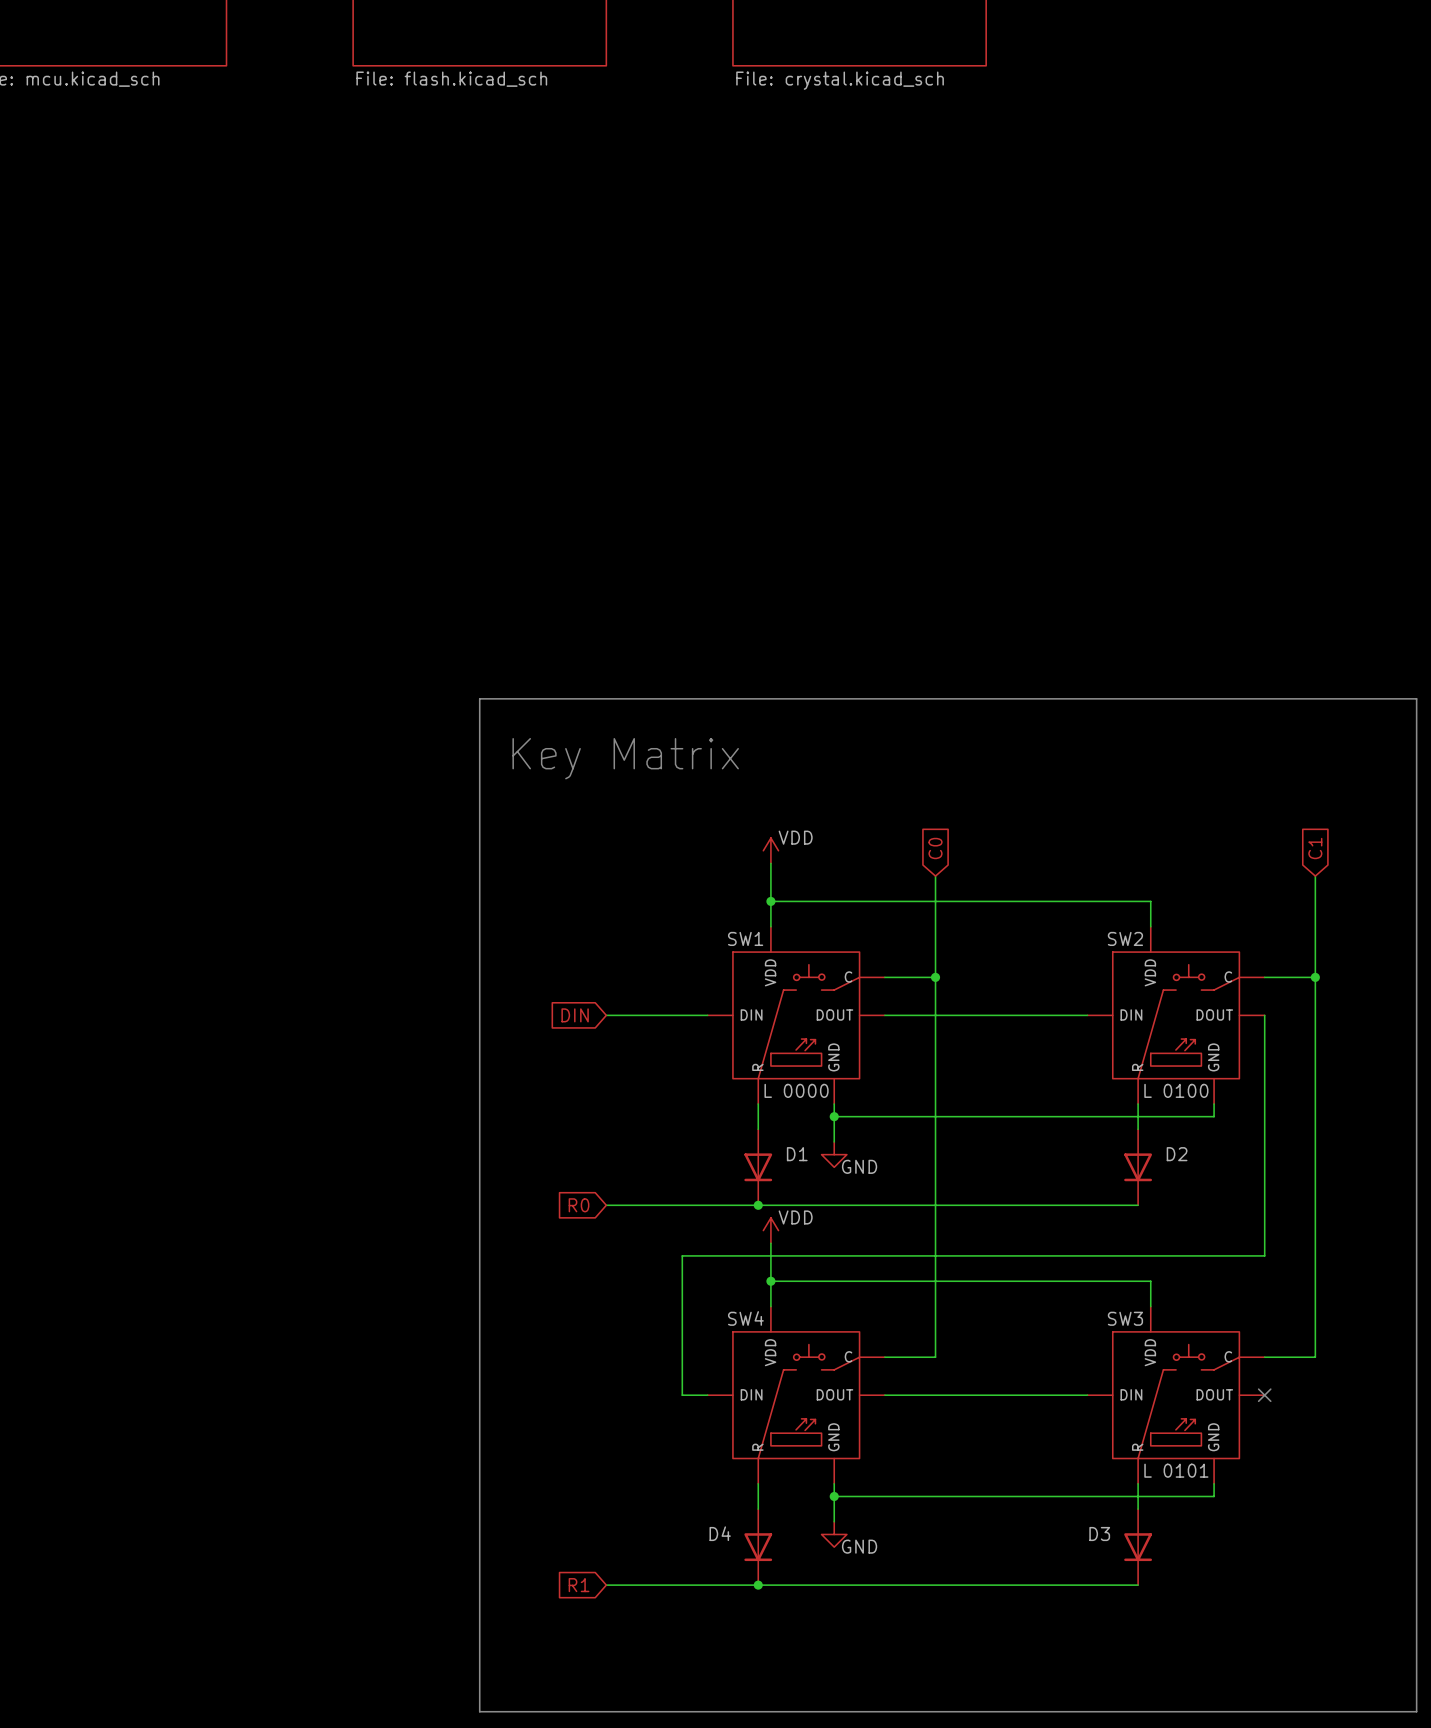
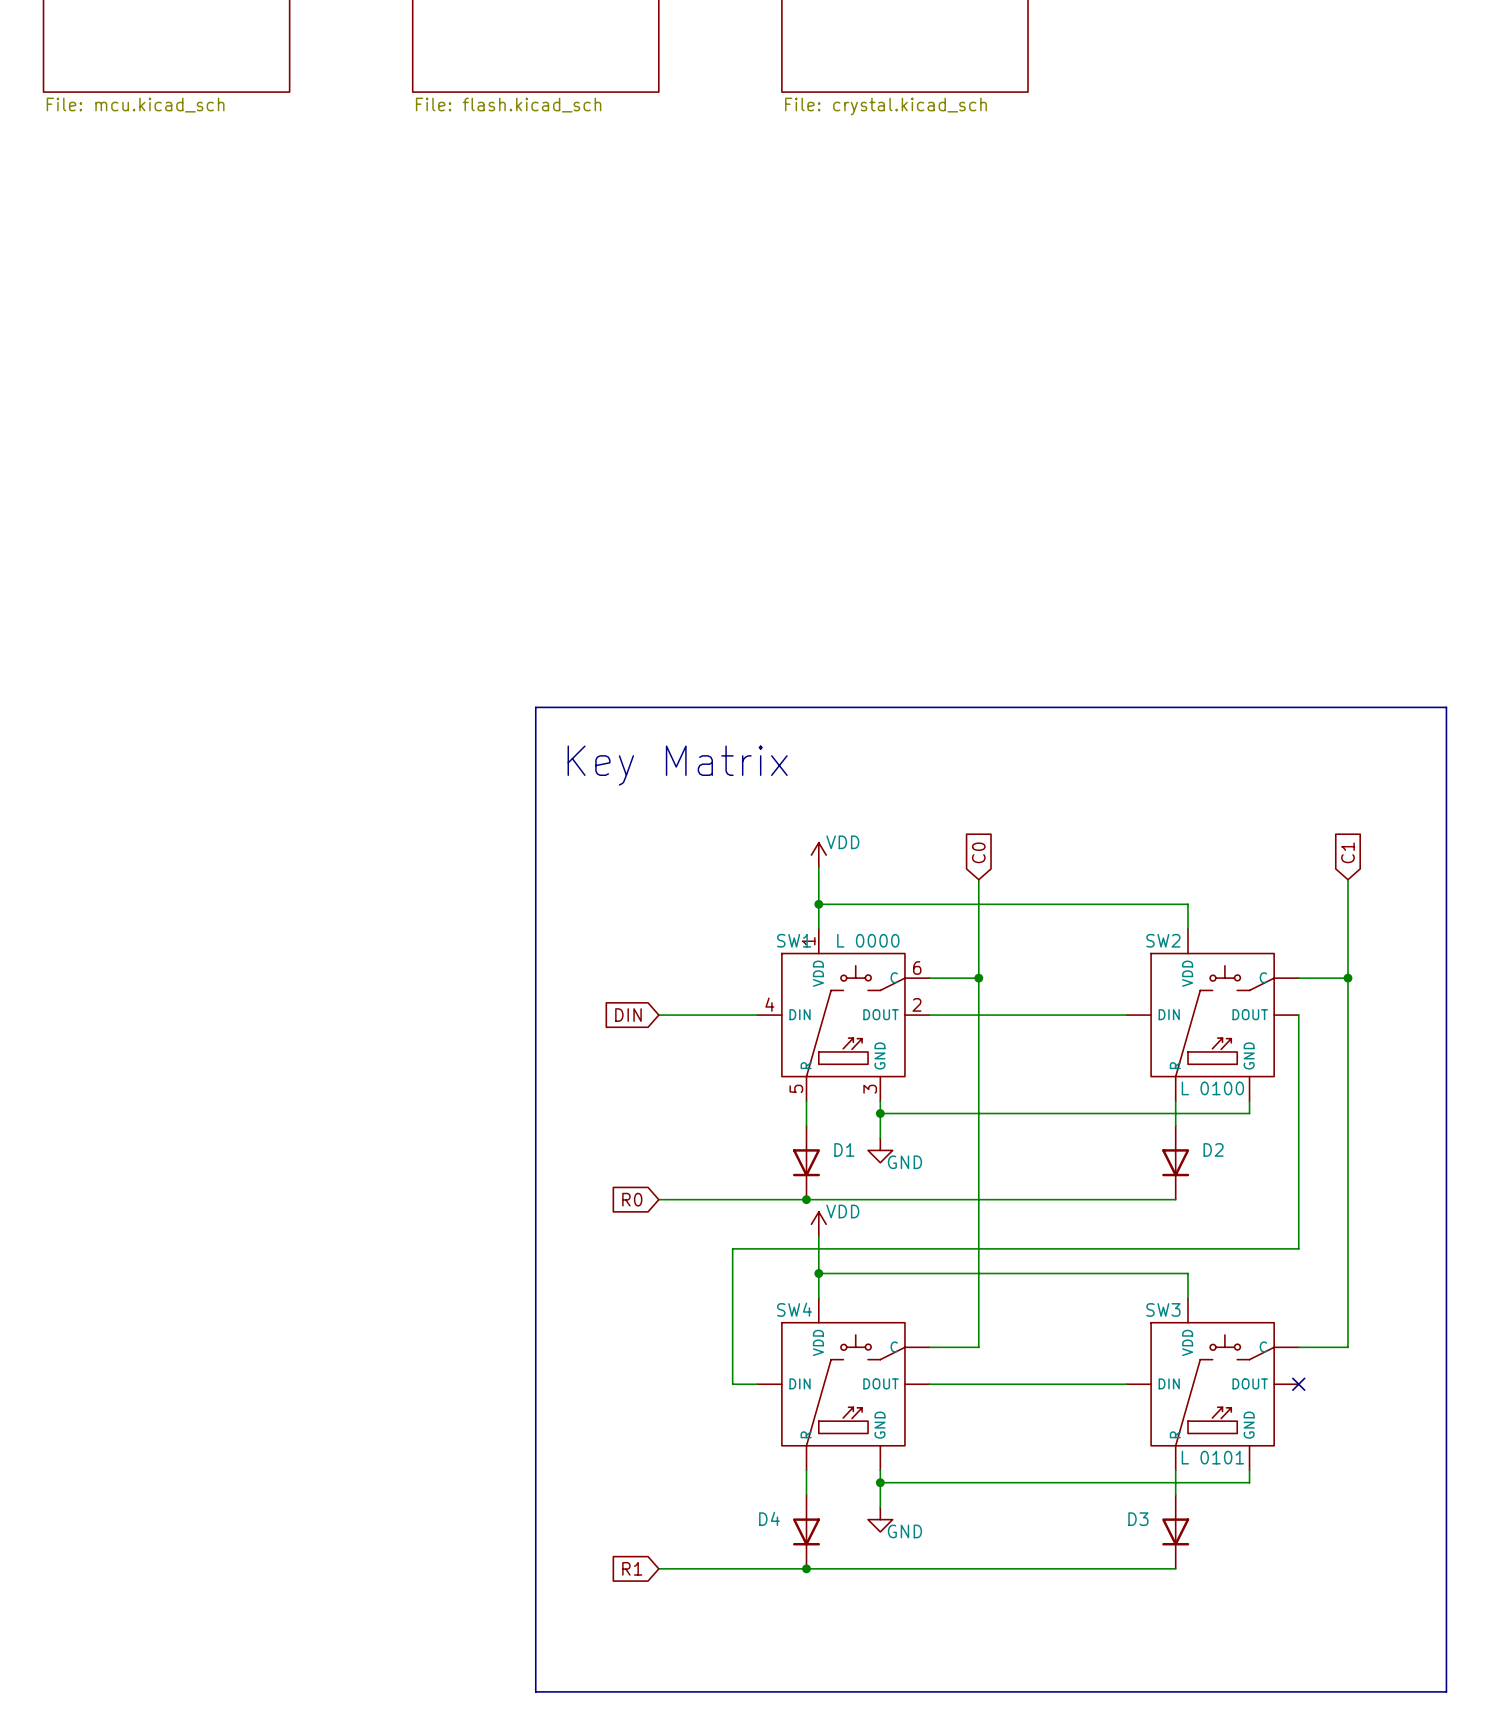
SW1 pin number: none -> 1 (808, 941)
SW1 pin number: none -> 6 (917, 967)
SW1 pin number: none -> 4 (769, 1004)
SW1 pin number: none -> 2 (916, 1004)
SW1 text position: L 0000 (796, 1090) -> L 0000 (868, 940)
SW1 pin number: none -> 5 (796, 1088)
SW1 pin number: none -> 3 (870, 1089)

